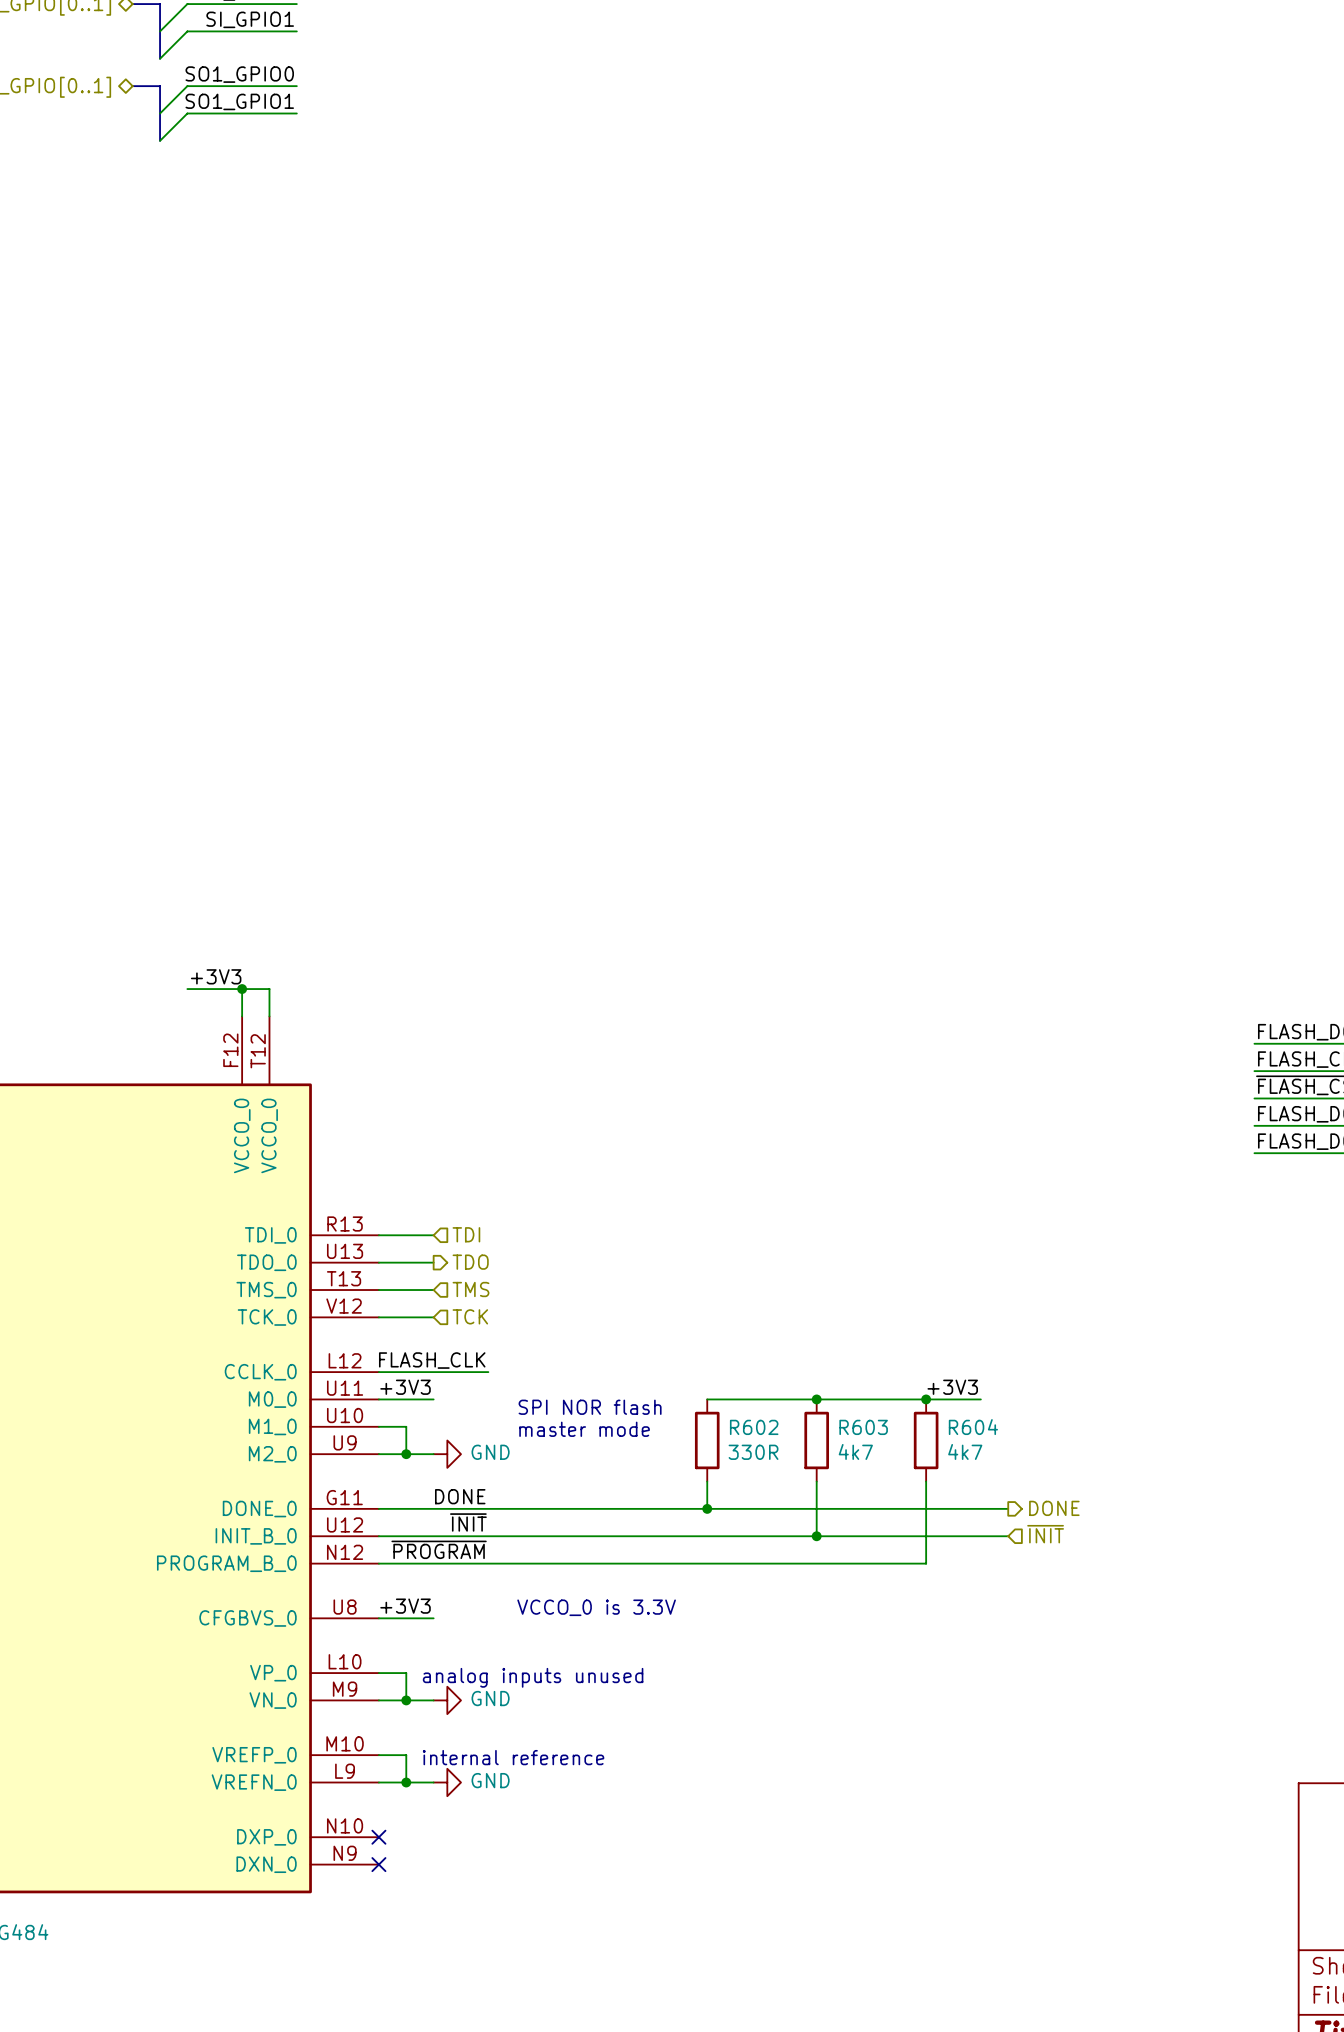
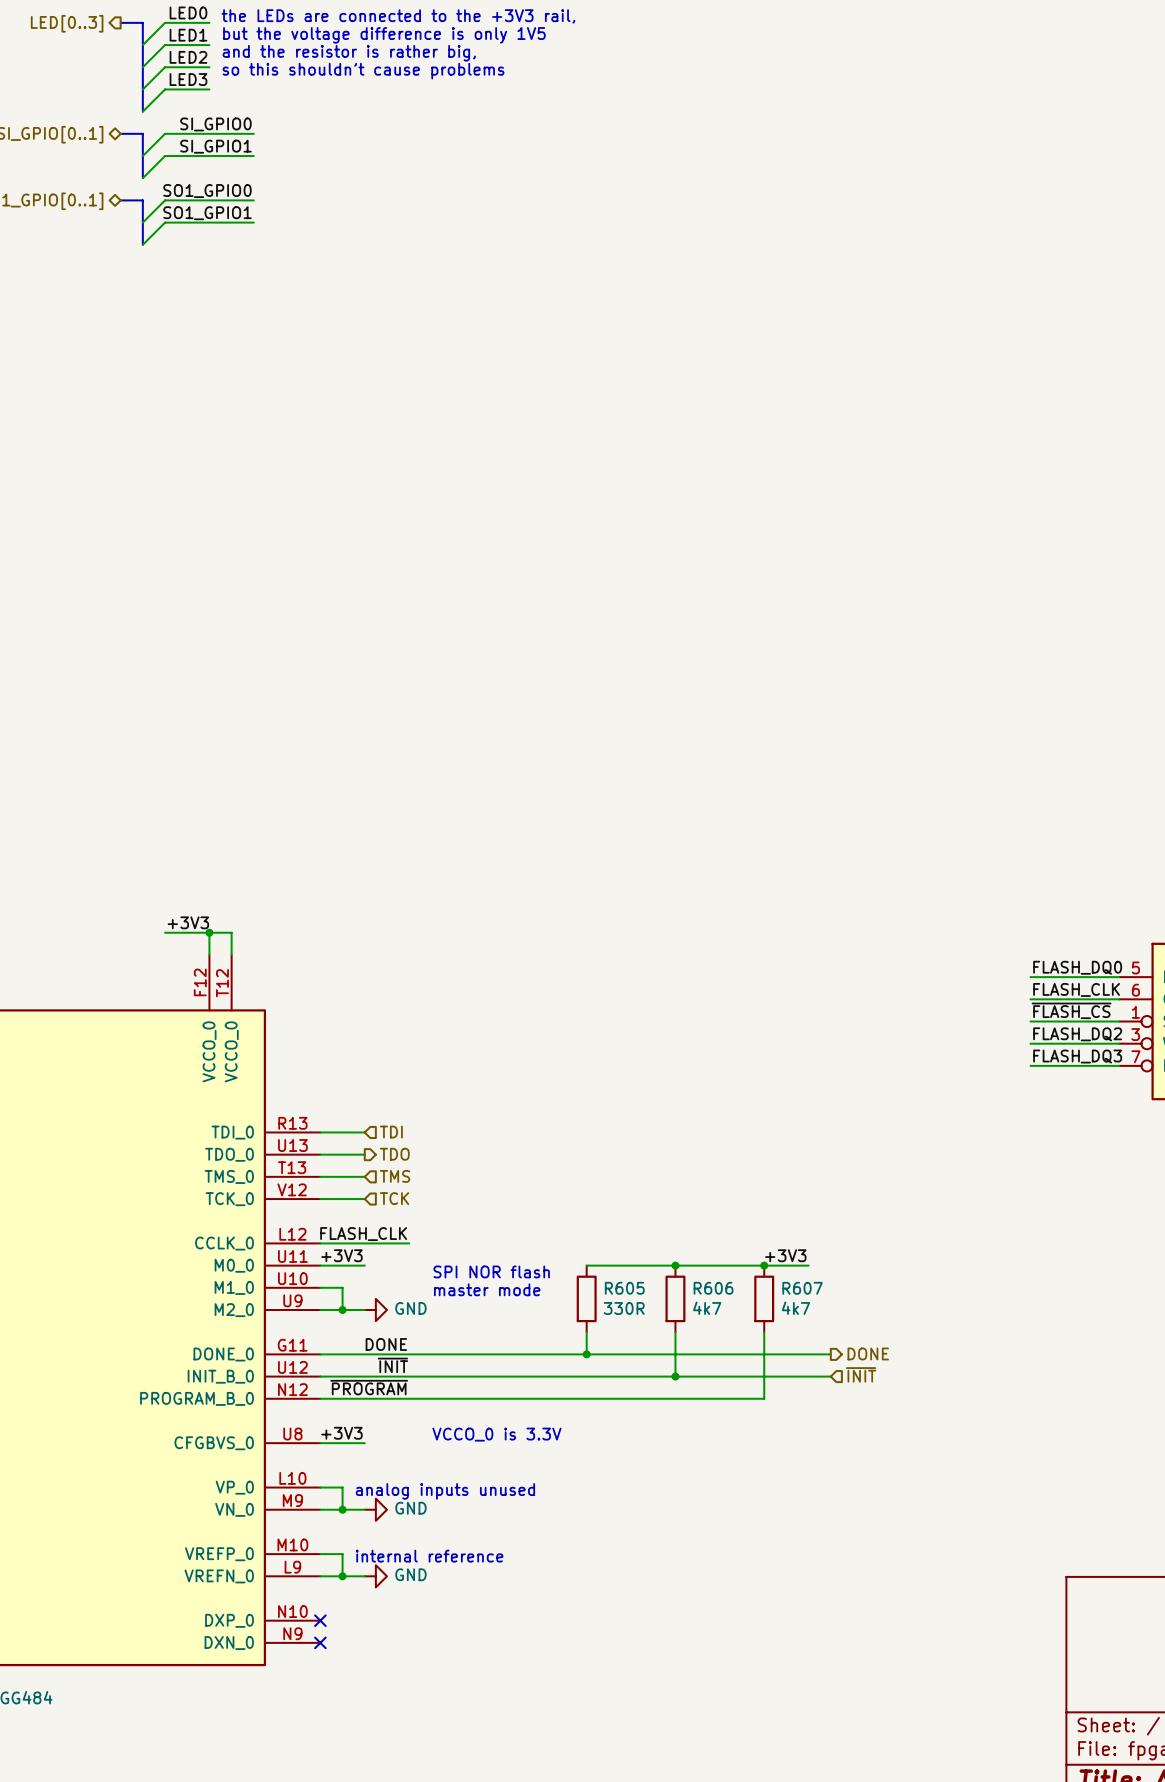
R602 name: R602 (754, 1427) -> R605 (624, 1288)
R603 name: R603 (863, 1427) -> R606 (713, 1288)
R604 name: R604 (973, 1427) -> R607 (802, 1288)

